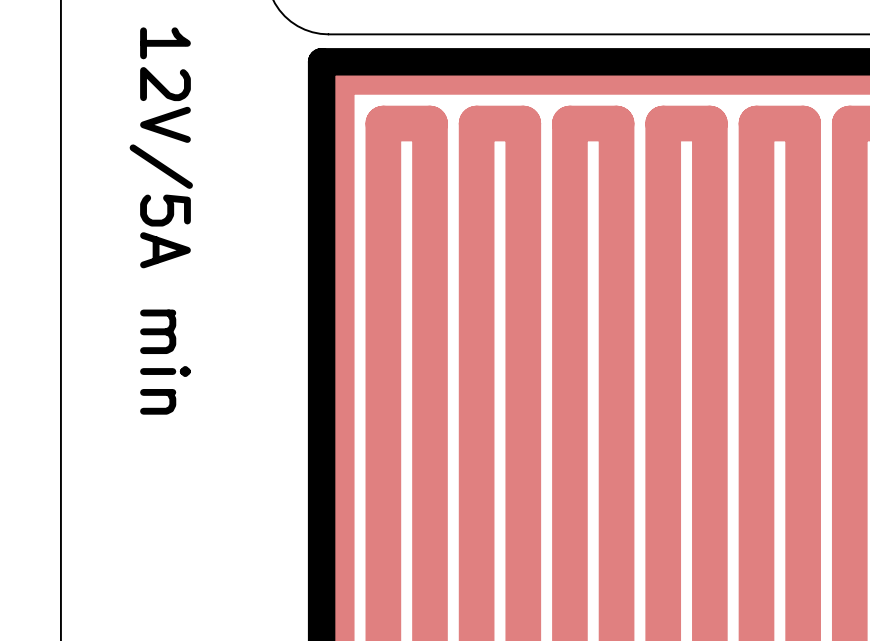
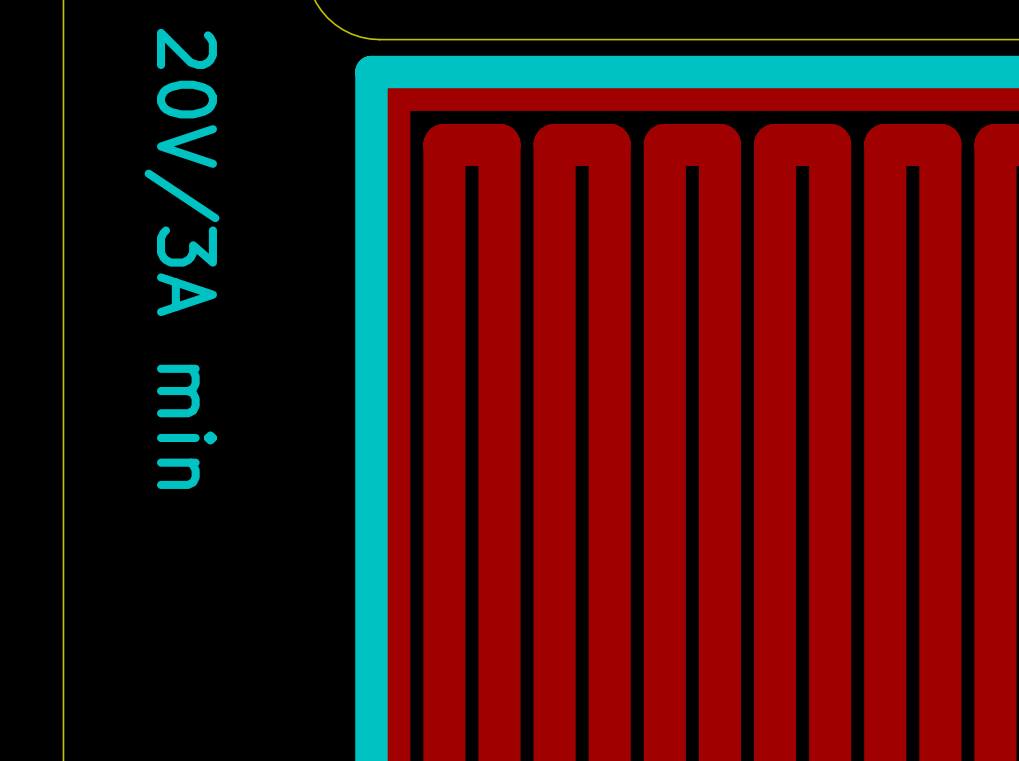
text: 12V/5A min (161, 221) -> 20V/3A min (182, 258)

